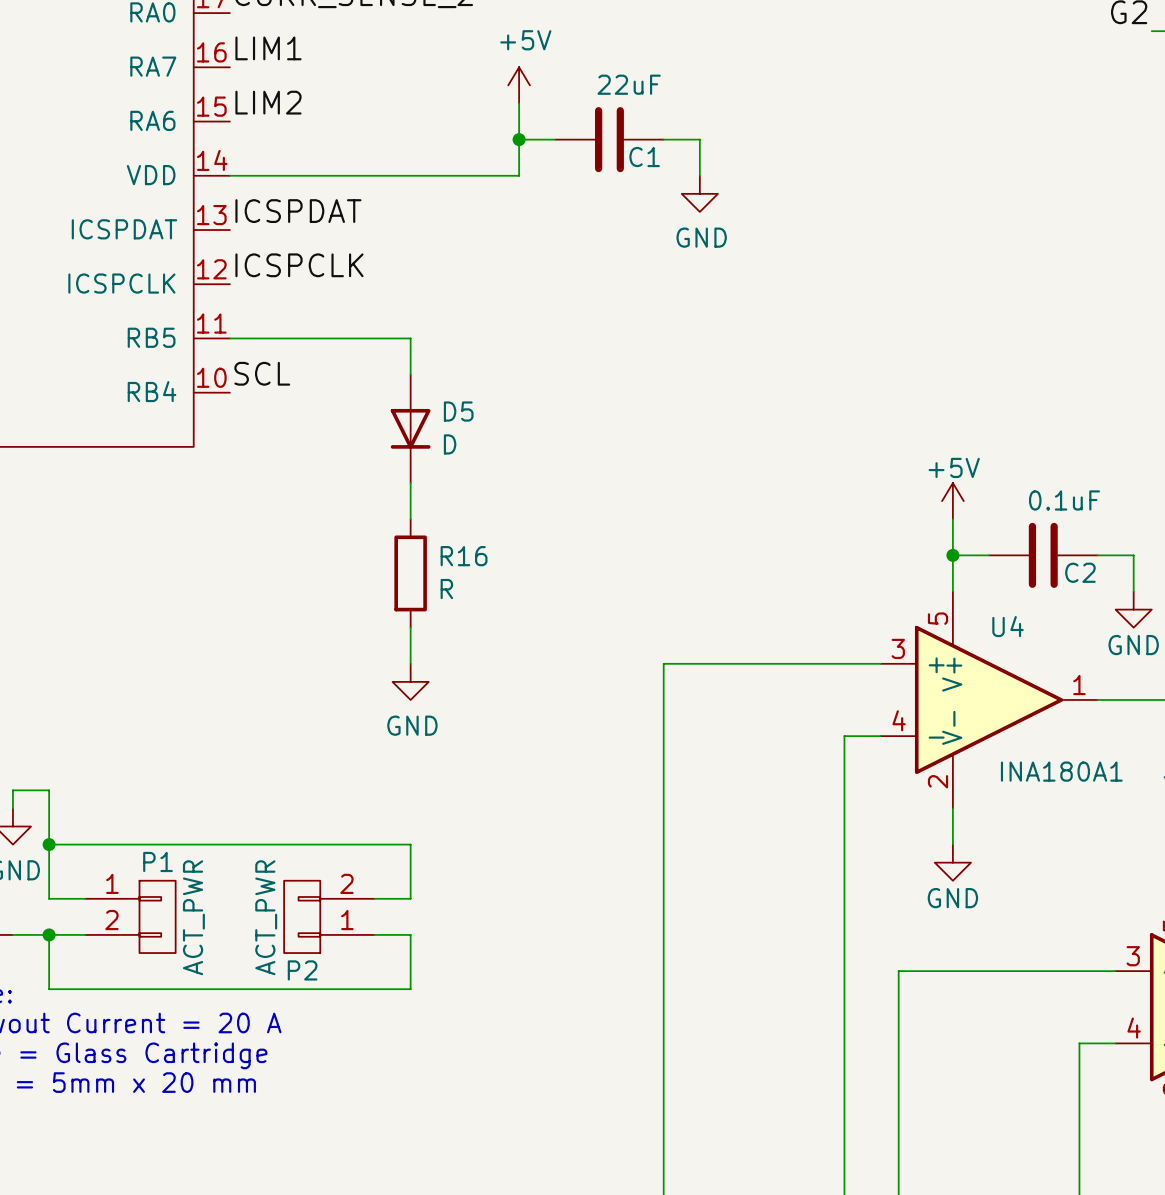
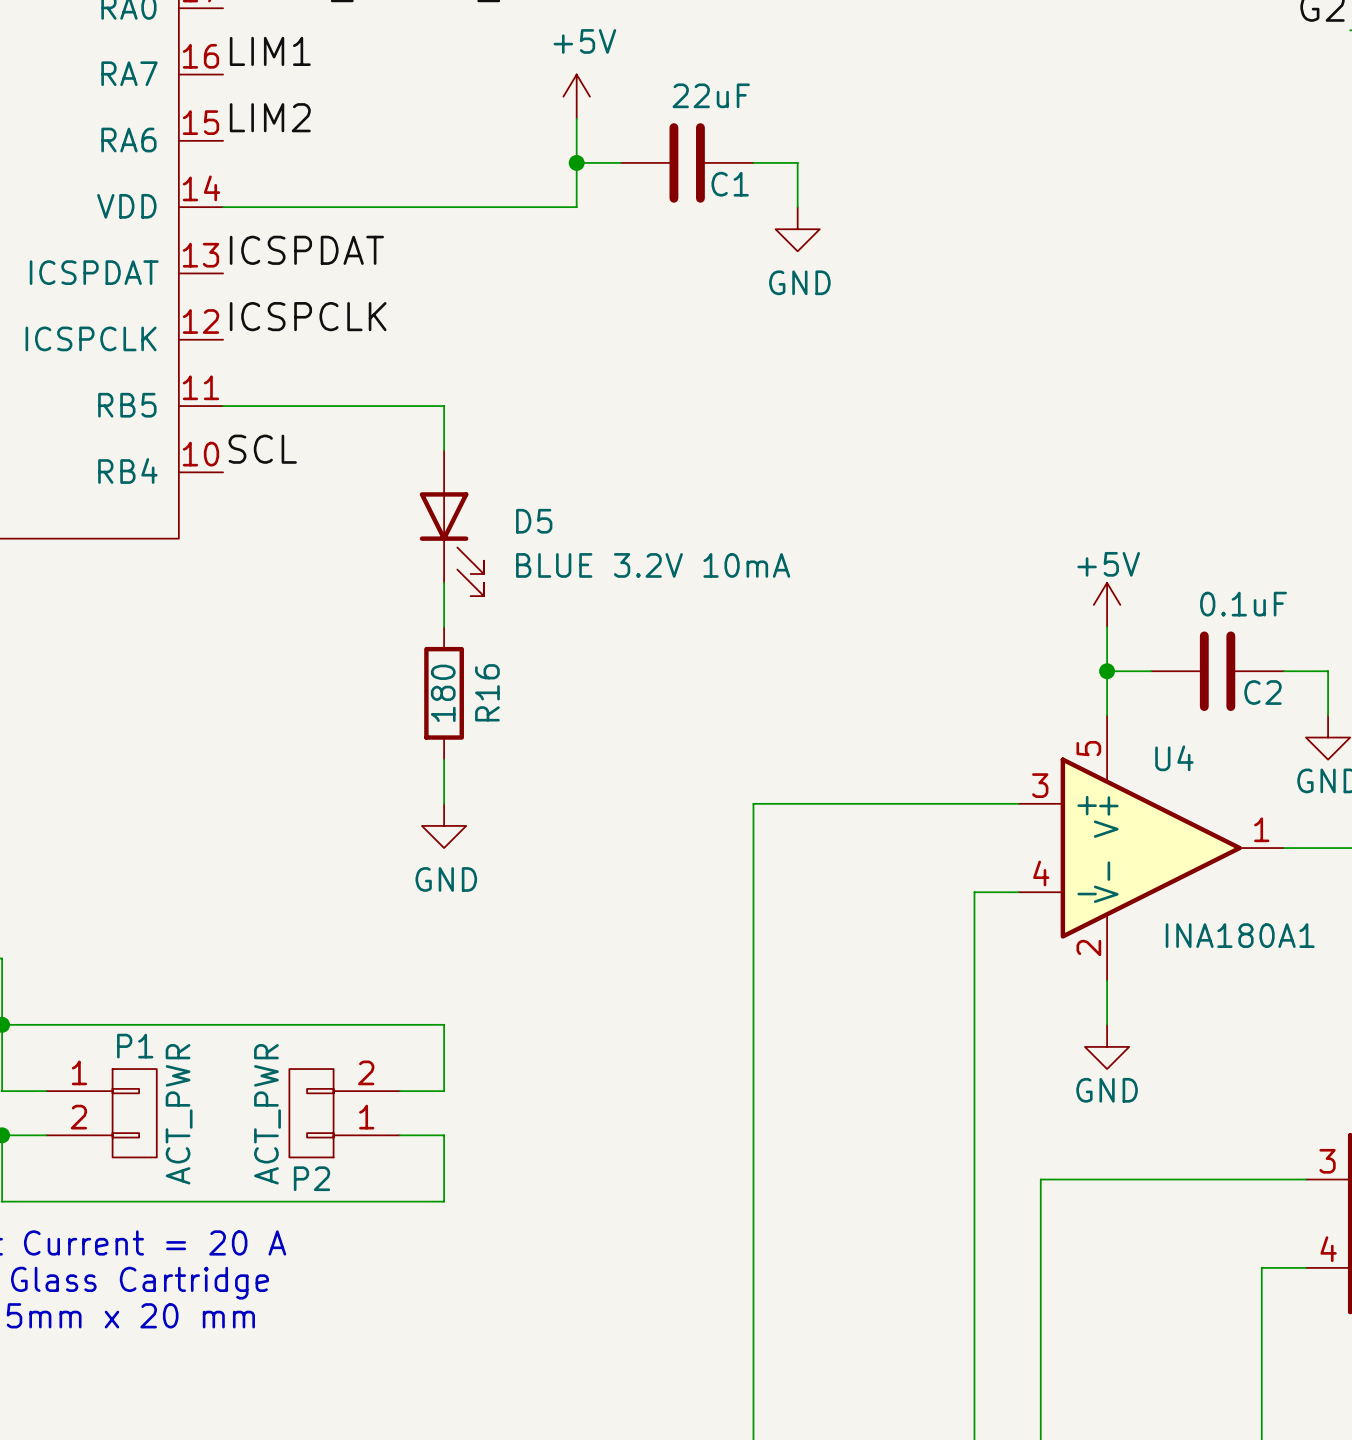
D5 symbol: [390, 374, 431, 484] -> [419, 450, 484, 597]
D5 value: D (450, 444) -> BLUE 3.2V 10mA (653, 565)
R16 name rotation: 0° (464, 556) -> 90° counterclockwise (487, 692)
R16 value: R (446, 589) -> 180 (443, 693)

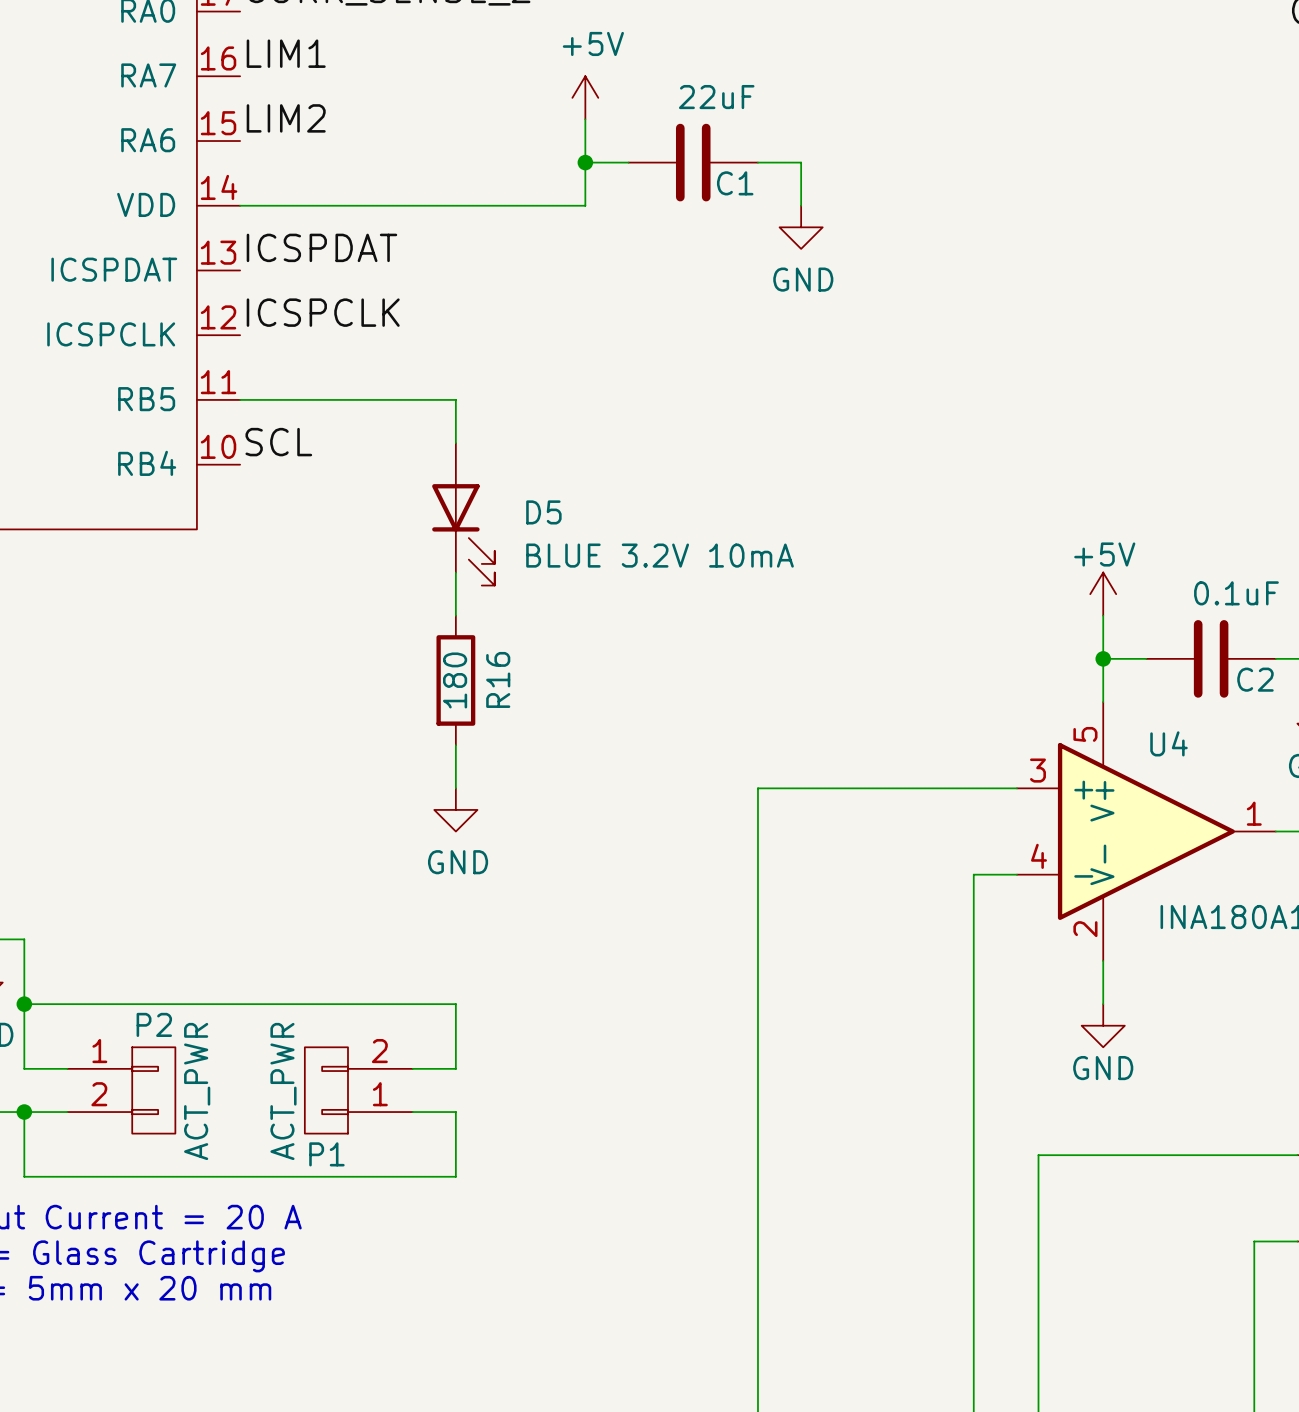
P1 name: P1 (135, 1046) -> P2 (154, 1024)
P2 name: P2 (312, 1178) -> P1 (326, 1154)

